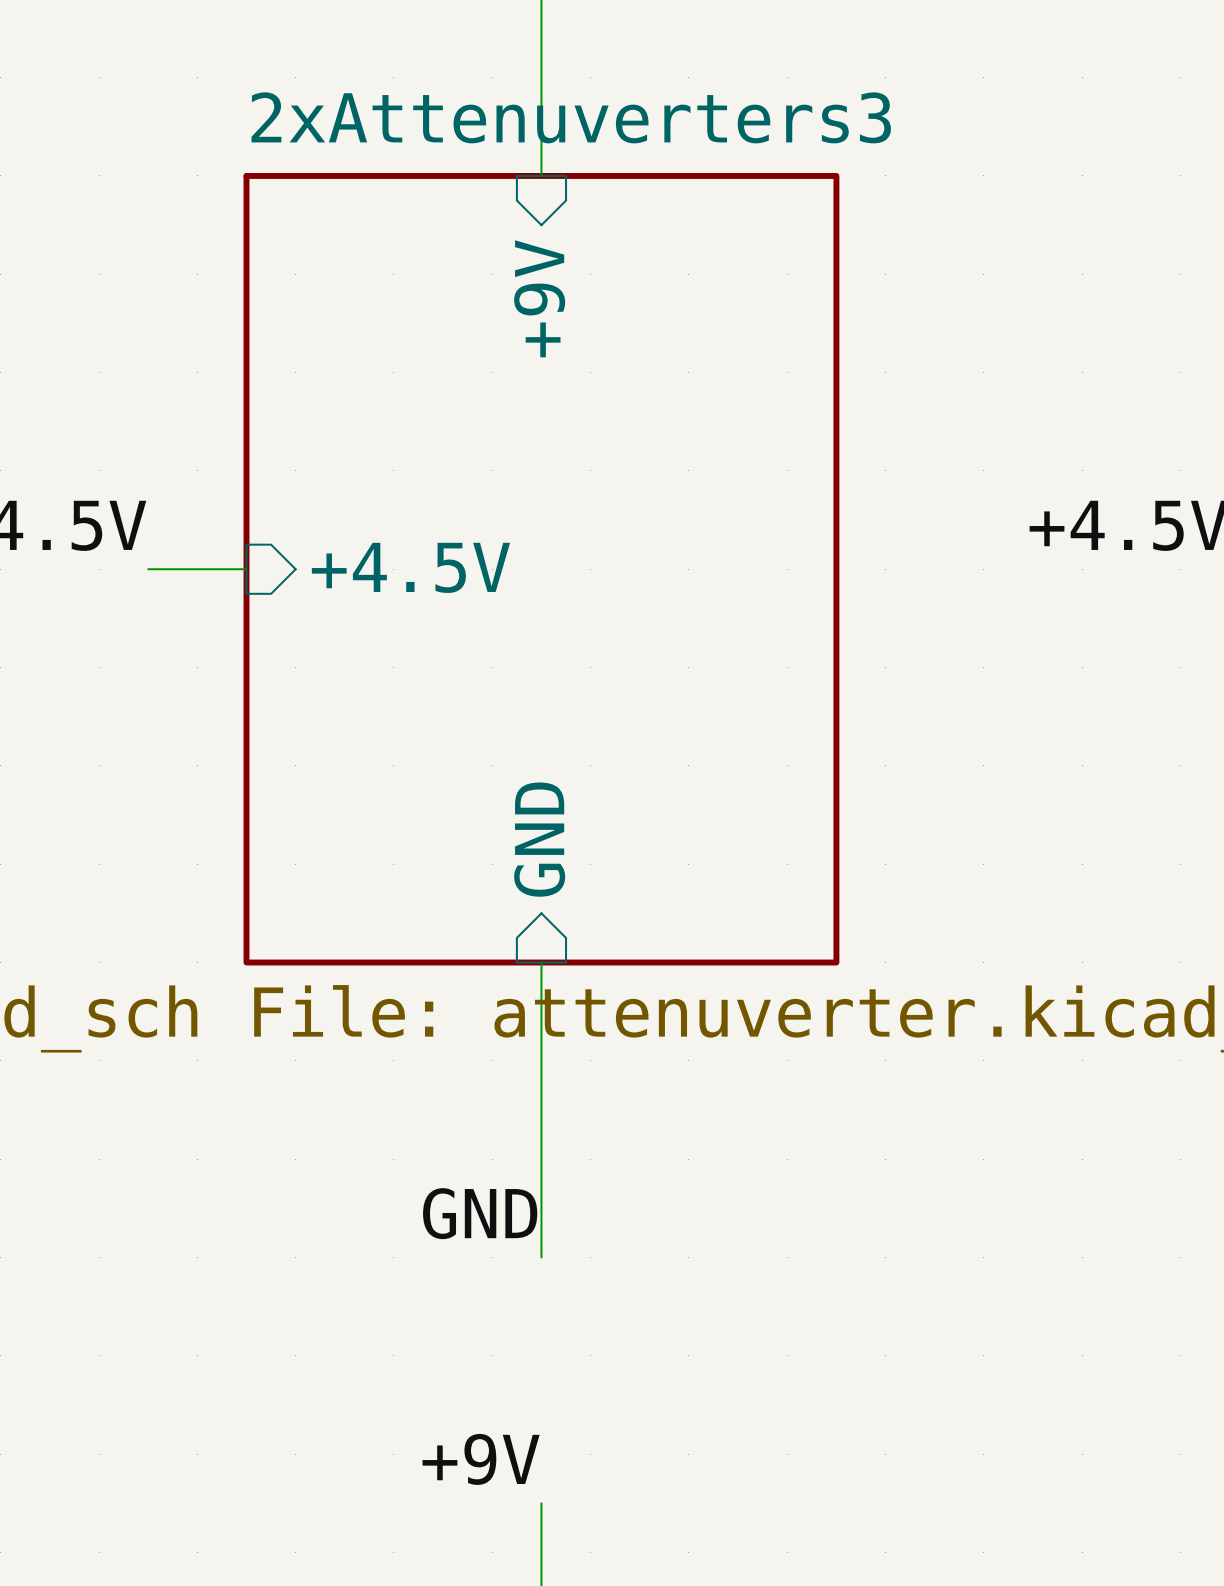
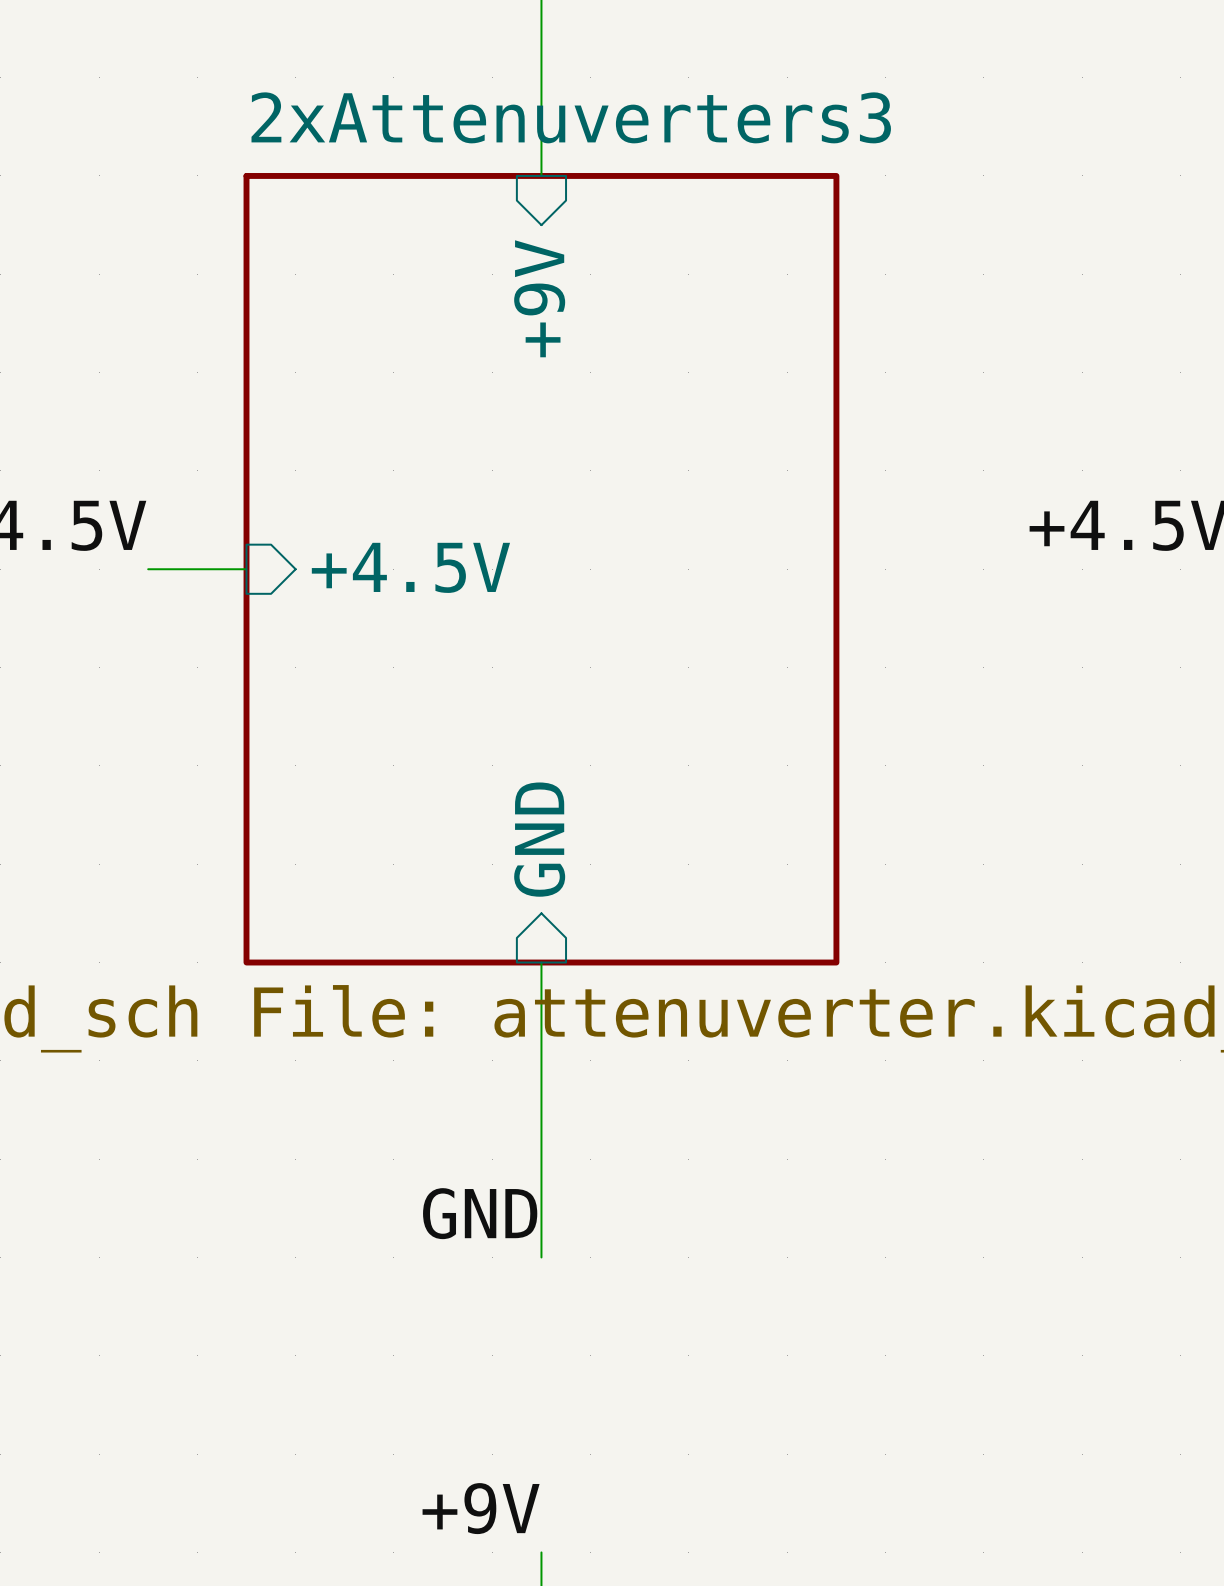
label position: +9V (481, 1459) -> +9V (481, 1508)
wire: (541, 1503) (541, 1552) -> none

